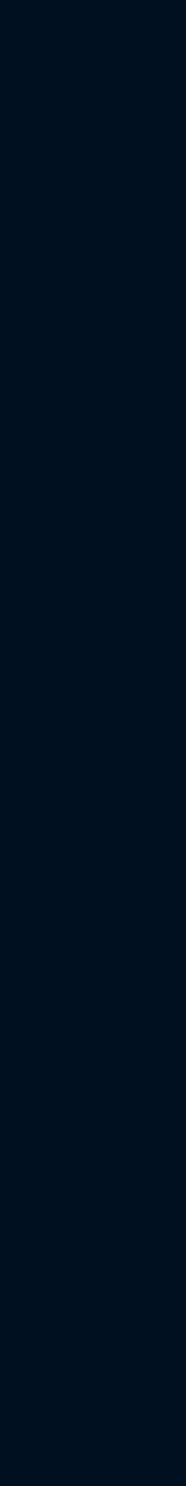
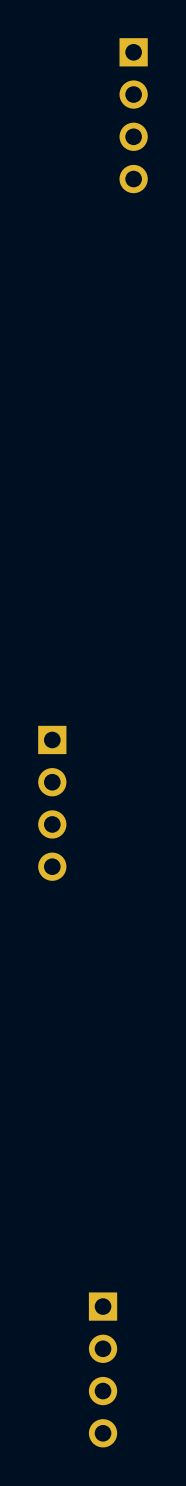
part: none -> (133, 115)
part: none -> (52, 803)
part: none -> (103, 1369)

